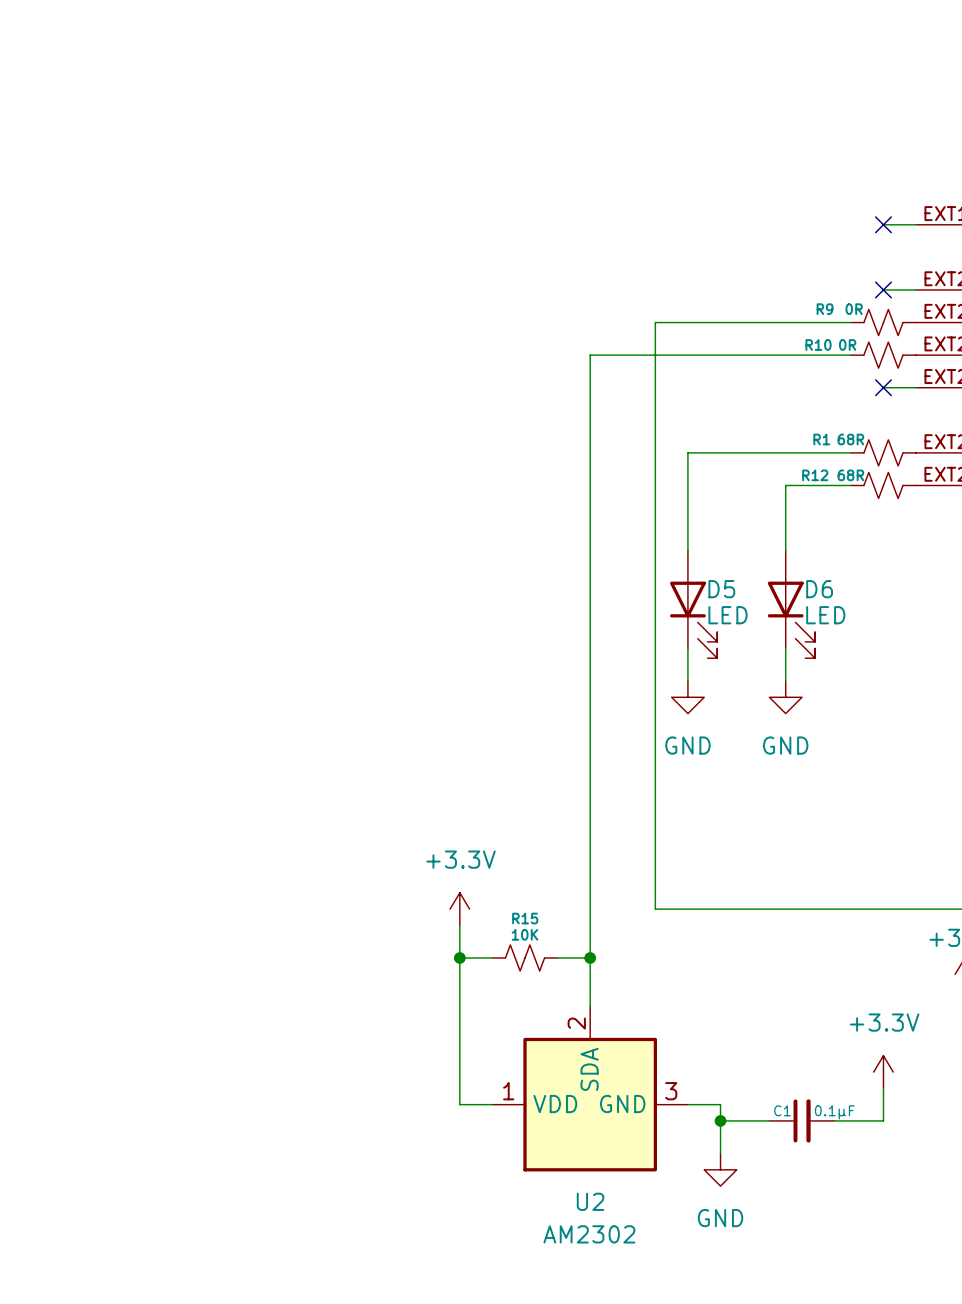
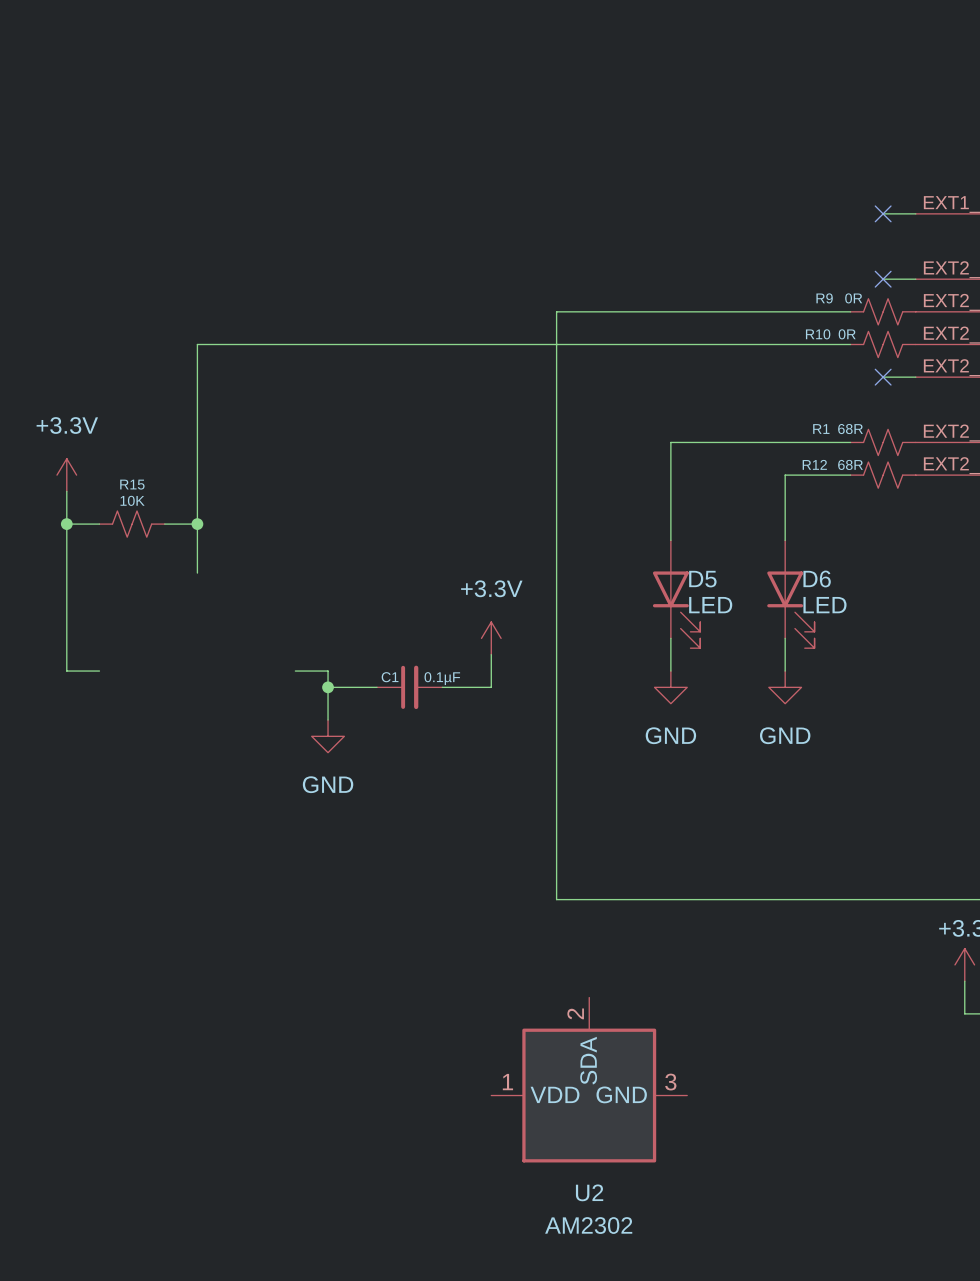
wire: (655, 322) (655, 909) -> (654, 311) (556, 311) (556, 899) (654, 899)
wire: (590, 355) (590, 1006) -> (589, 344) (197, 344) (197, 573)
wire: (687, 452) (687, 550) -> (687, 442) (670, 442) (670, 540)
power symbol: none -> +3.3V (66, 475)
wire: none -> (66, 491) (66, 671) (99, 671)
wire: none -> (66, 524) (99, 524)
junction: none -> (66, 524)
wire: none -> (164, 524) (197, 524)
junction: none -> (197, 524)
D5 position: (693, 604) -> (676, 594)
wire: (687, 648) (687, 681) -> (670, 638) (670, 671)
wire: none -> (491, 654) (491, 687) (442, 687)
wire: none -> (295, 671) (328, 671) (328, 720)
wire: none -> (328, 687) (377, 687)
junction: none -> (328, 687)
power symbol position: GND (687, 697) -> GND (670, 687)
power symbol: none -> GND (328, 736)
power symbol position: +3.3V (459, 909) -> +3.3V (491, 638)
wire: (459, 925) (459, 1104) (492, 1104) -> none
wire: (459, 958) (492, 958) -> none
junction: (459, 958) -> none
R15 position: (525, 958) -> (132, 524)
wire: (557, 958) (590, 958) -> none
junction: (590, 958) -> none
power symbol: +3.3V (883, 1072) -> none
wire: (883, 1088) (883, 1120) (834, 1120) -> none
wire: (687, 1104) (720, 1104) (720, 1153) -> none
wire: (720, 1120) (769, 1120) -> none
junction: (720, 1120) -> none
C1 position: (802, 1120) -> (409, 687)
power symbol: GND (720, 1169) -> none

